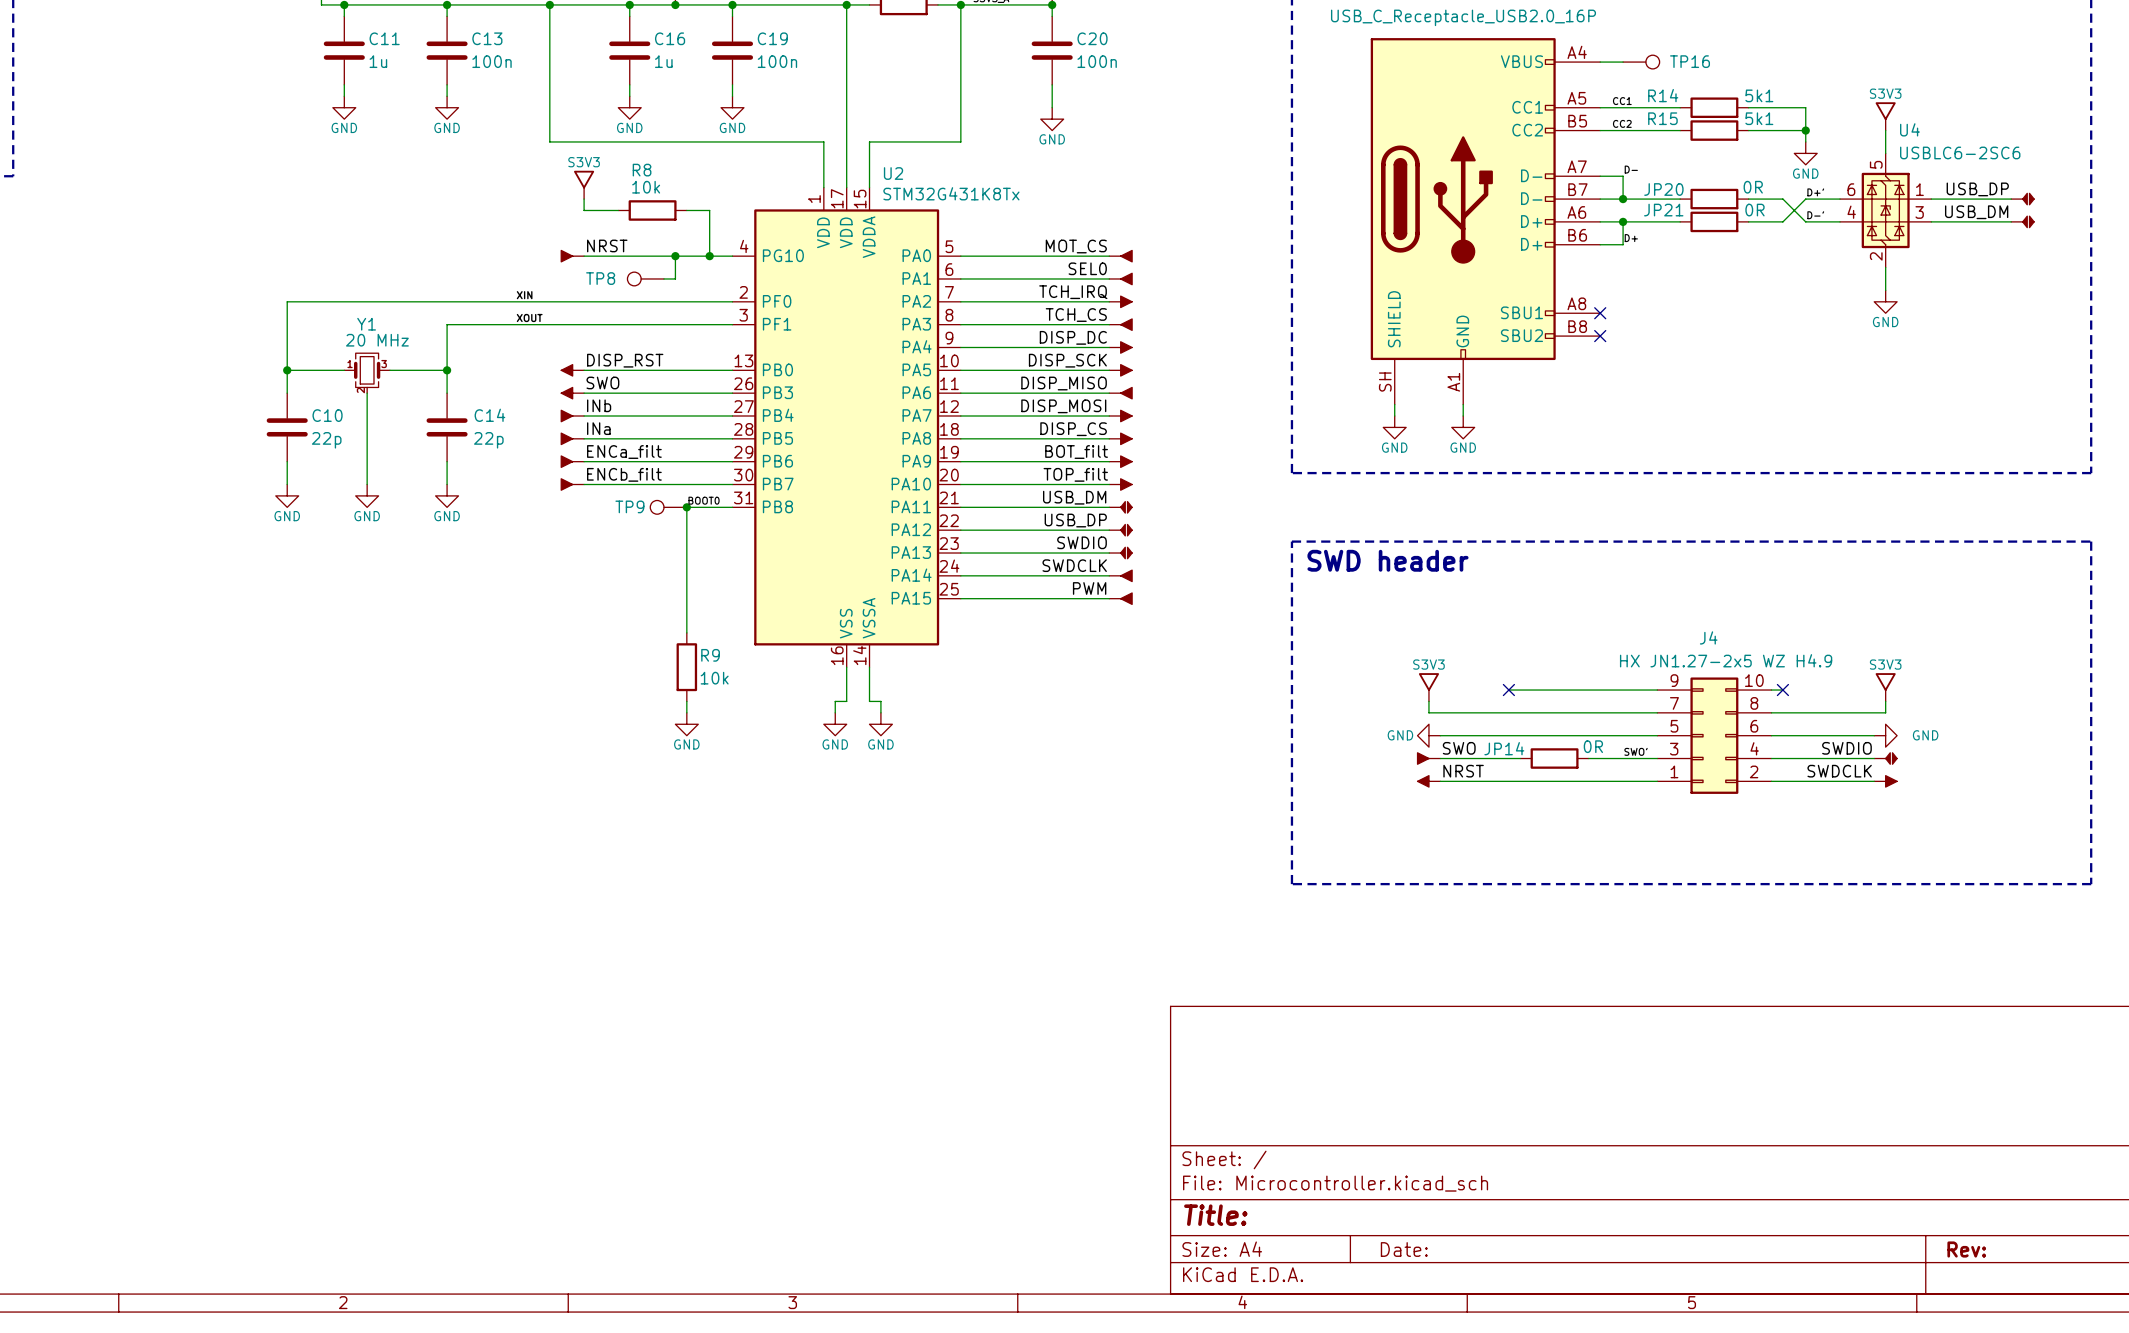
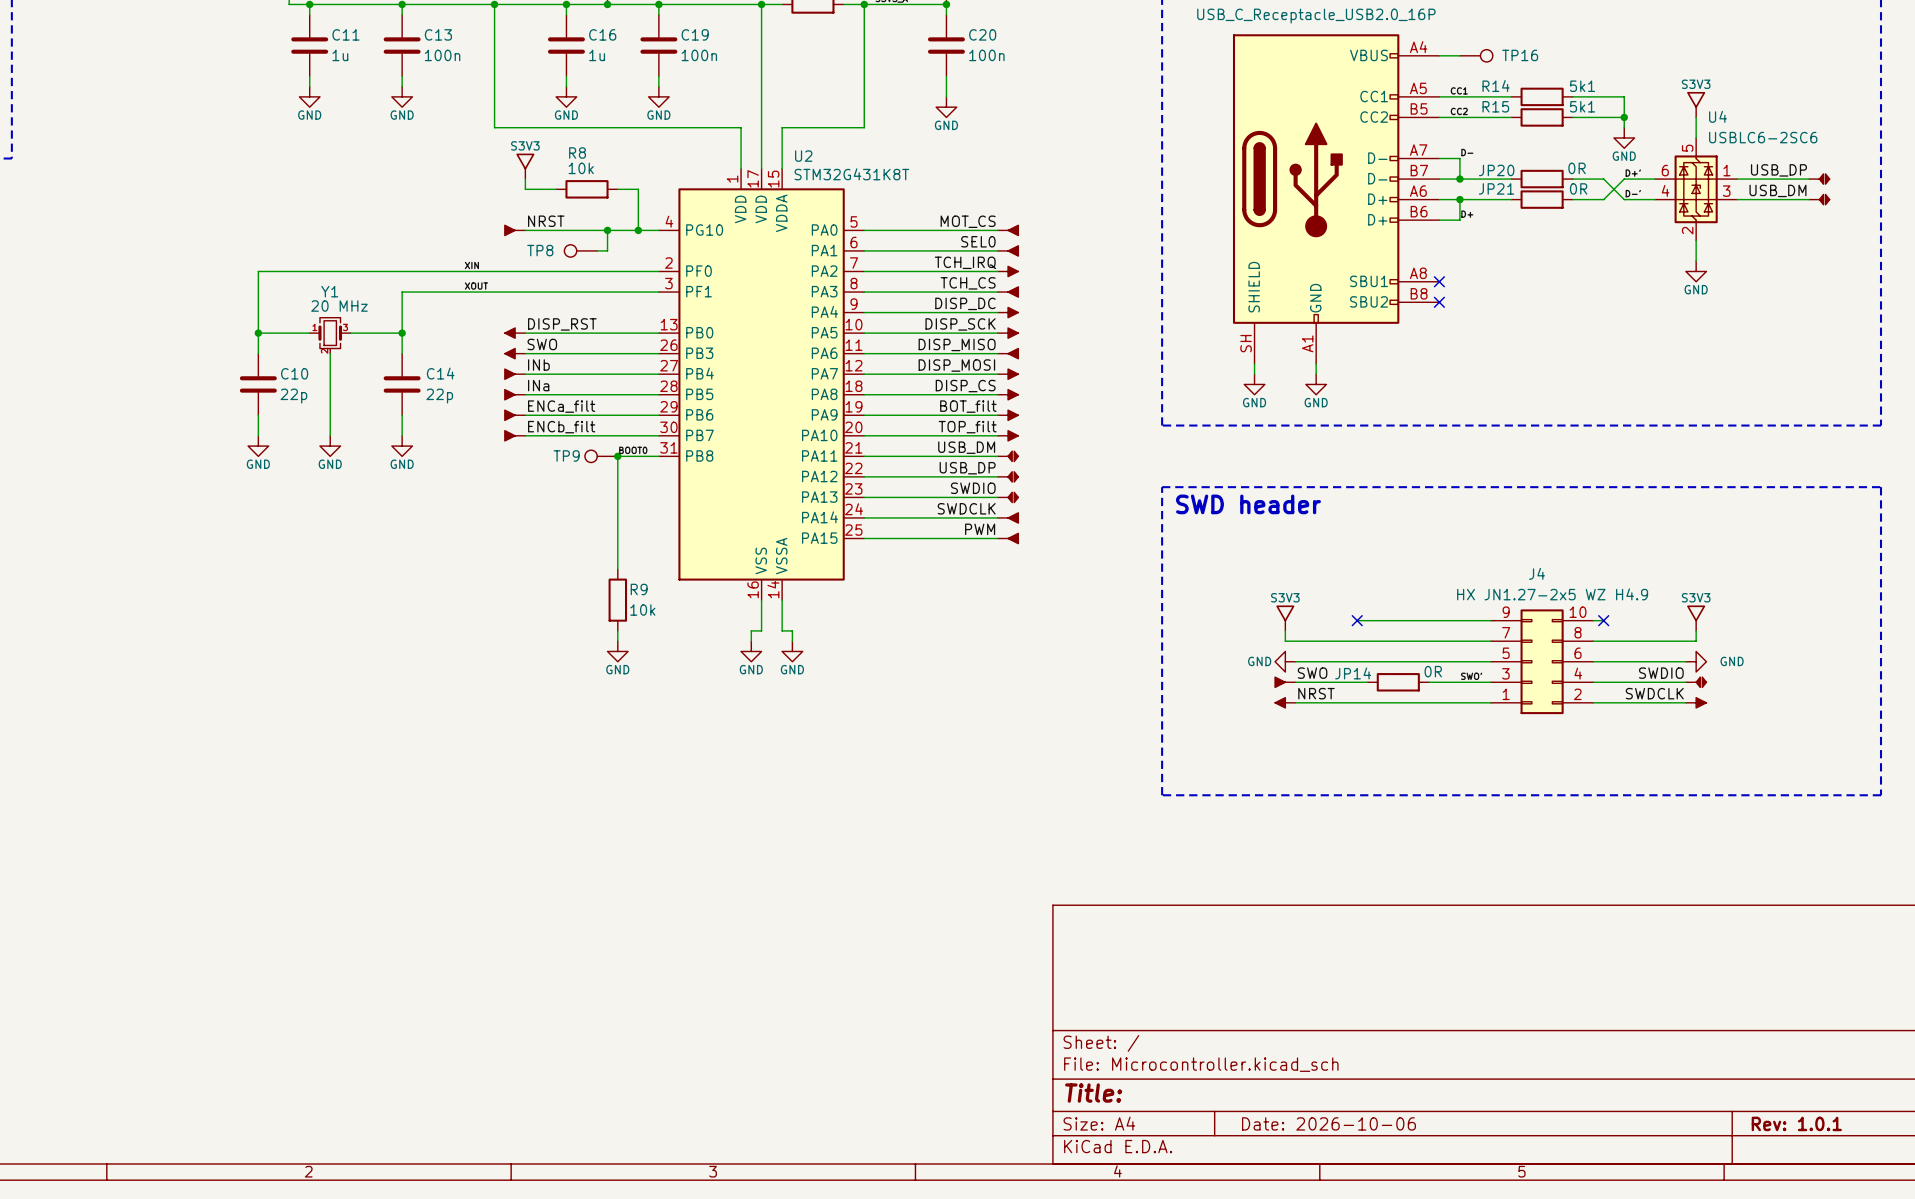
U2 value: STM32G431K8Tx (951, 193) -> STM32G431K8T (851, 174)
title block: Date: (1404, 1249) -> Date: 2026-10-06 (1328, 1123)
title block: Rev: (1966, 1249) -> Rev: 1.0.1 (1796, 1123)

